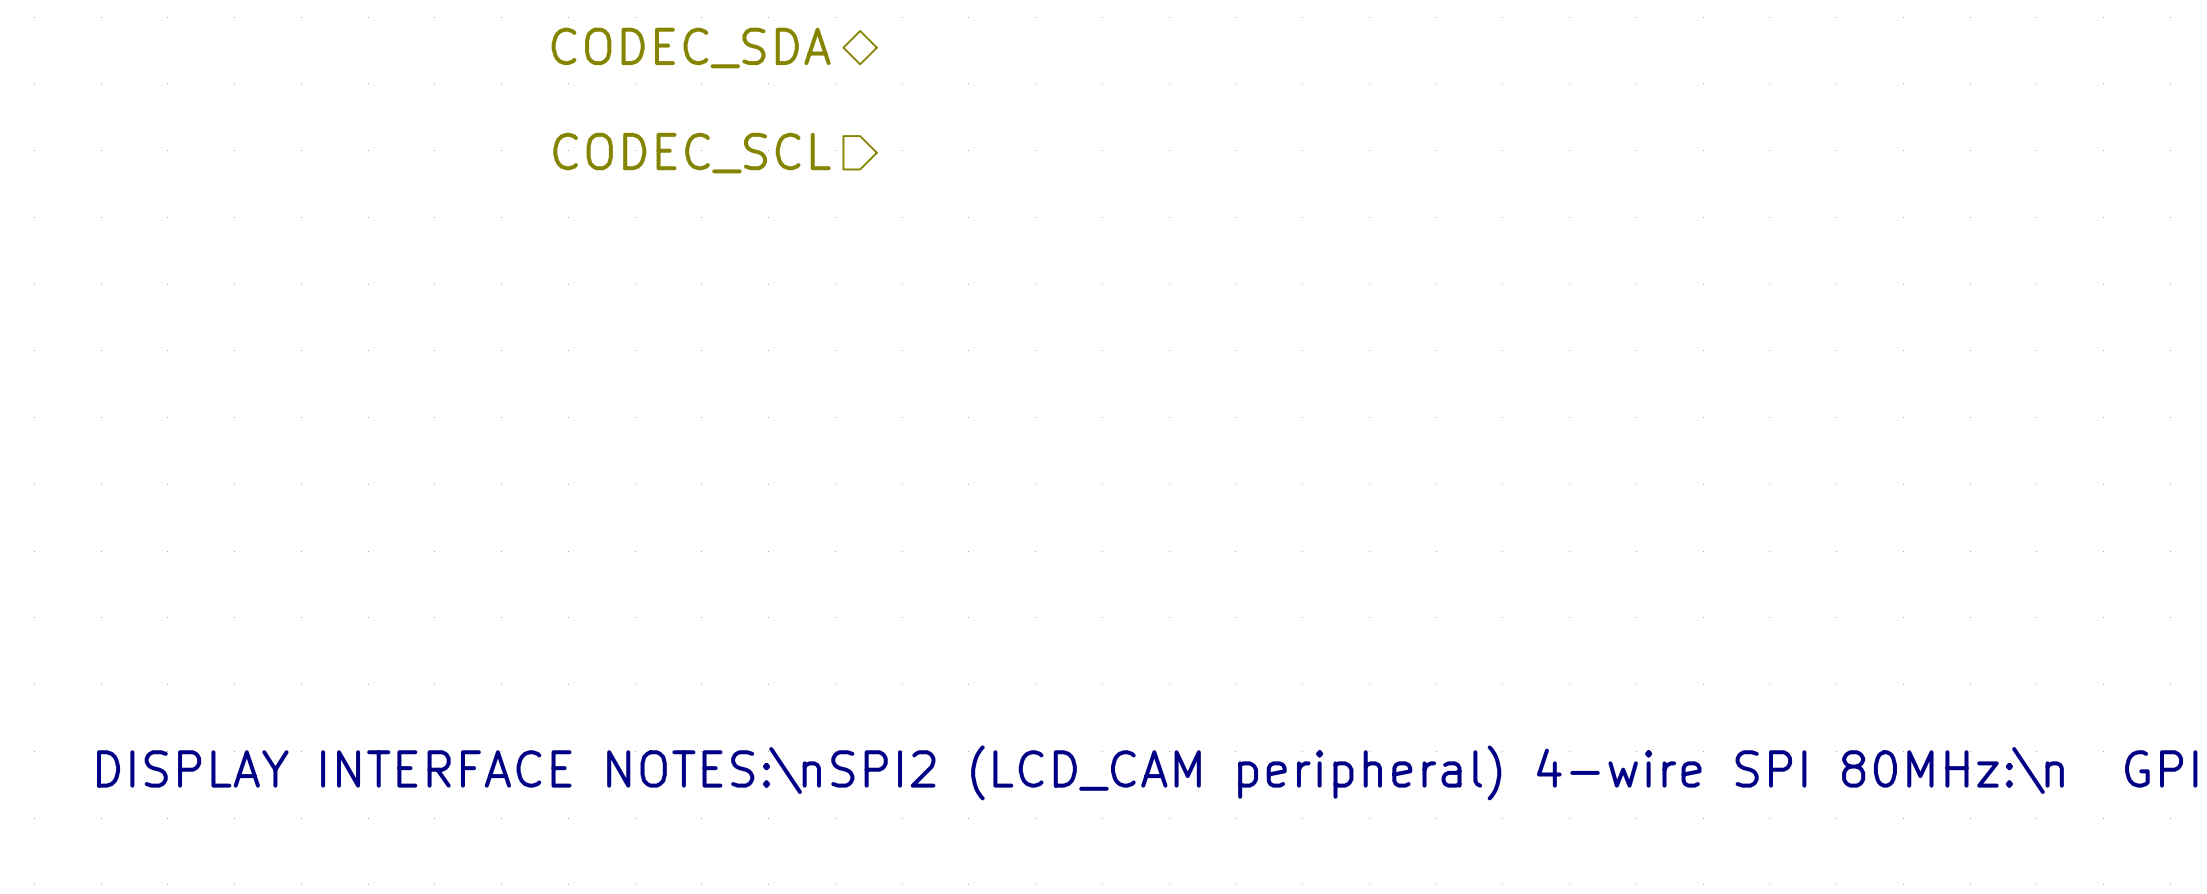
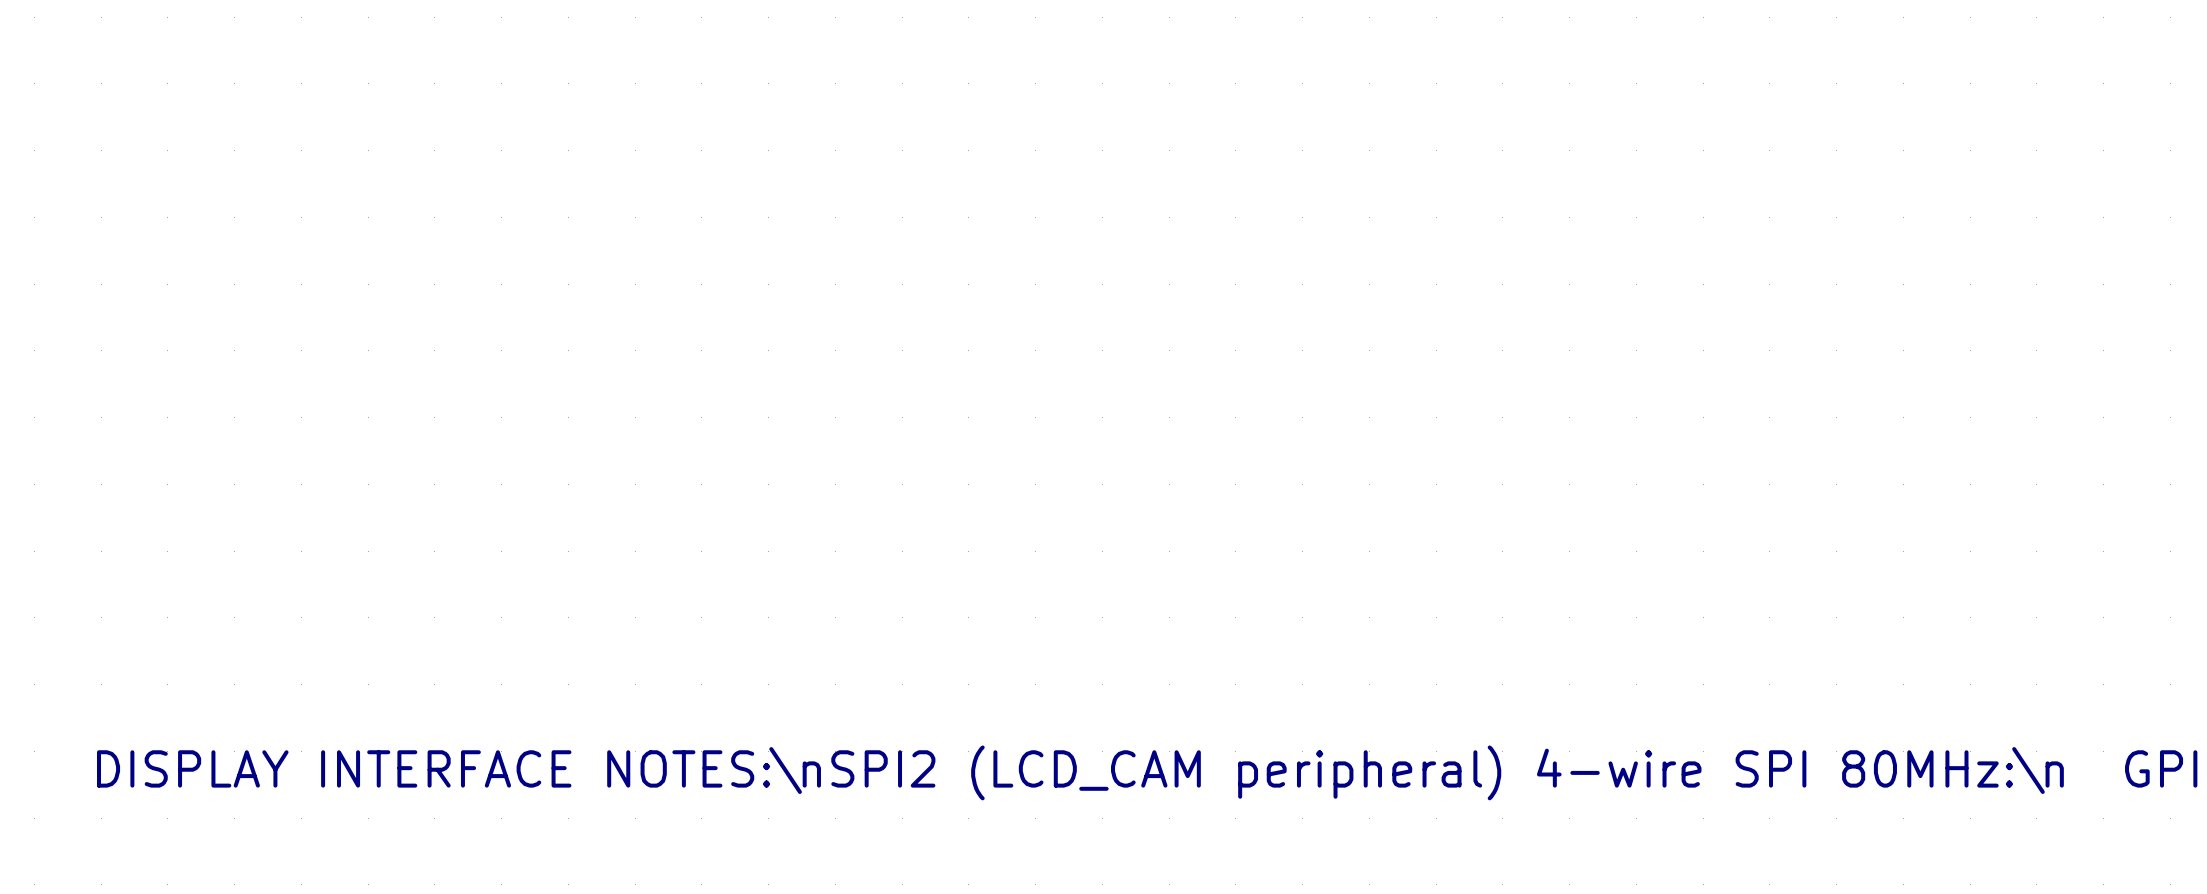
hierarchical label: CODEC_SDA (691, 47) -> none
hierarchical label: CODEC_SCL (691, 153) -> none

